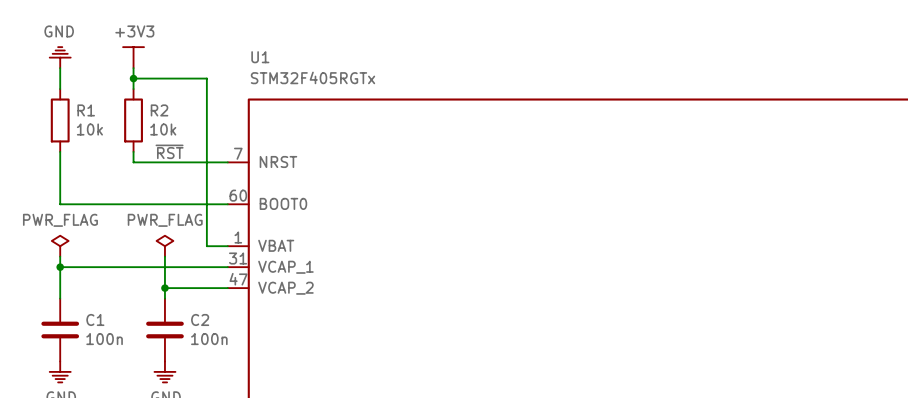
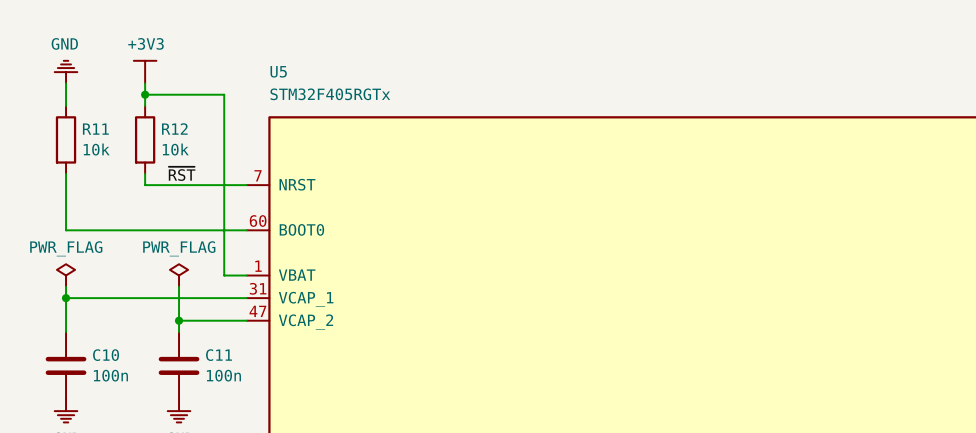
U1 name: U1 (260, 57) -> U5 (278, 71)
R1 name: R1 (86, 110) -> R11 (95, 129)
R2 name: R2 (159, 110) -> R12 (174, 129)
C1 name: C1 (95, 319) -> C10 (106, 355)
C2 name: C2 (200, 319) -> C11 (219, 355)

